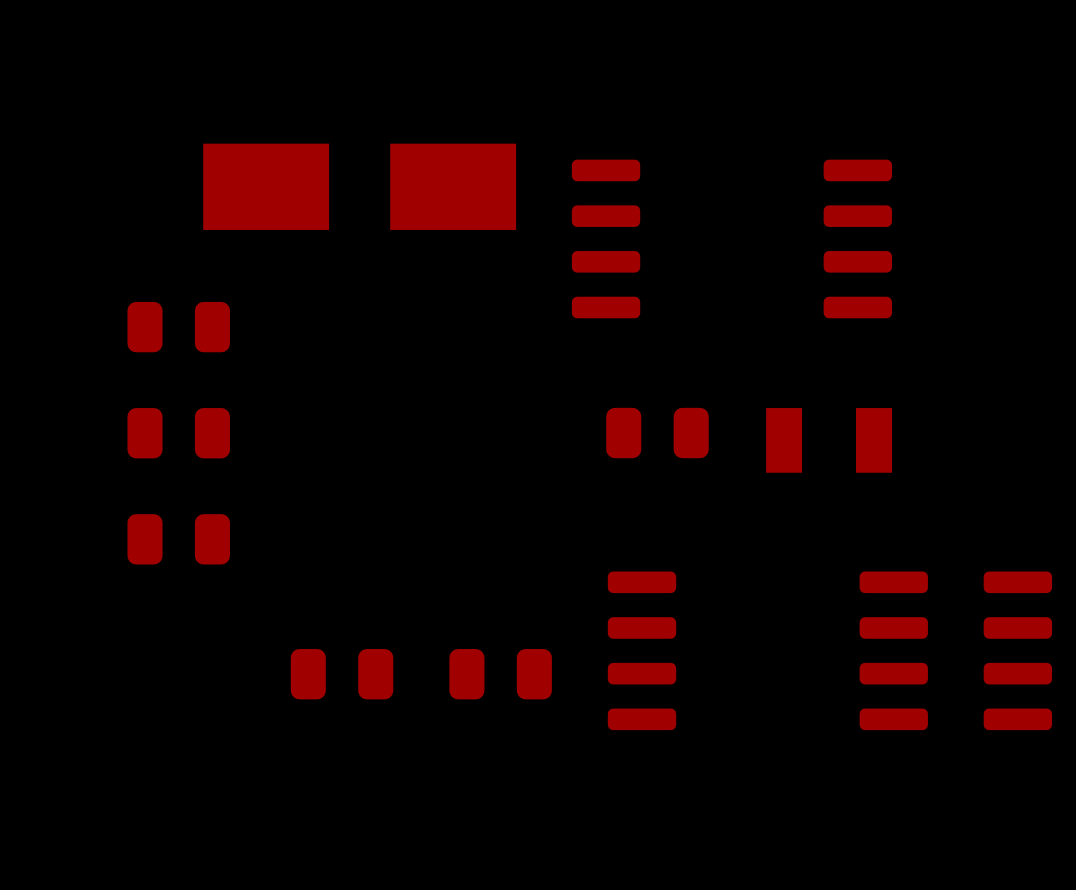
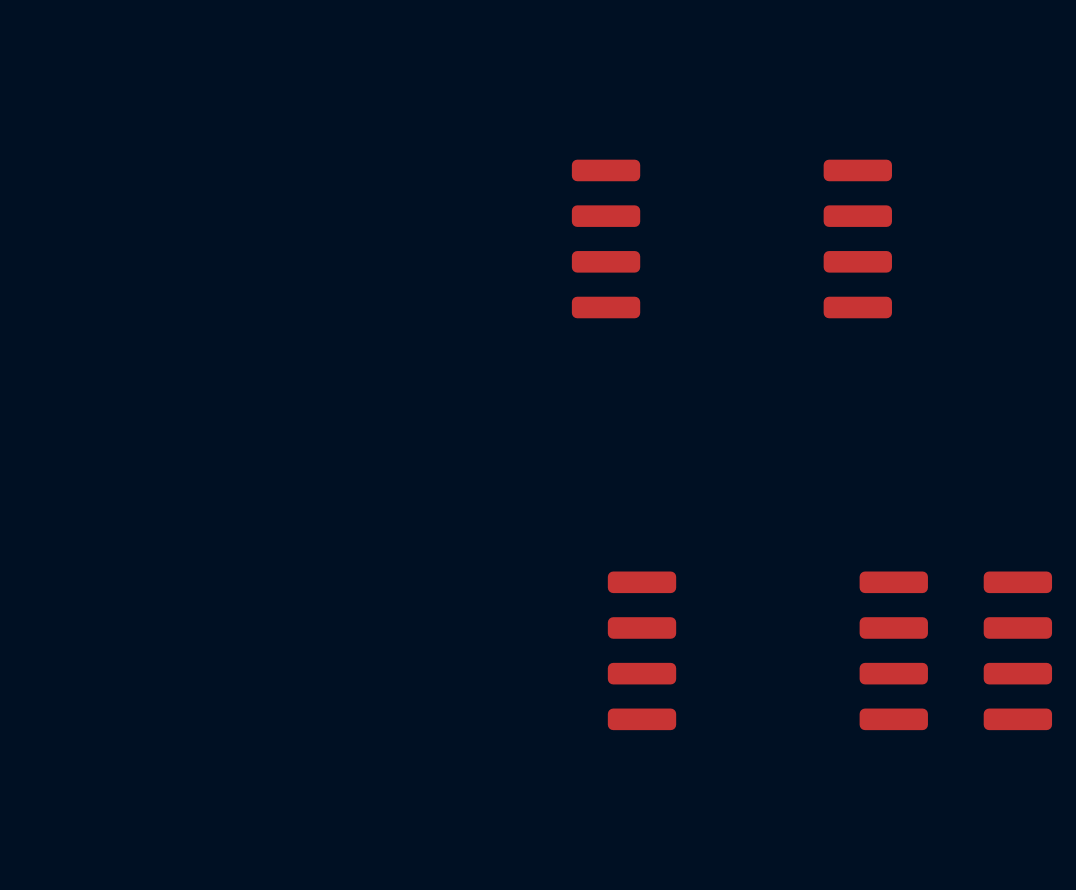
part: (359, 186) -> none
part: (178, 327) -> none
part: (178, 433) -> none
part: (657, 433) -> none
part: (829, 440) -> none
part: (178, 539) -> none
part: (342, 674) -> none
part: (500, 674) -> none

